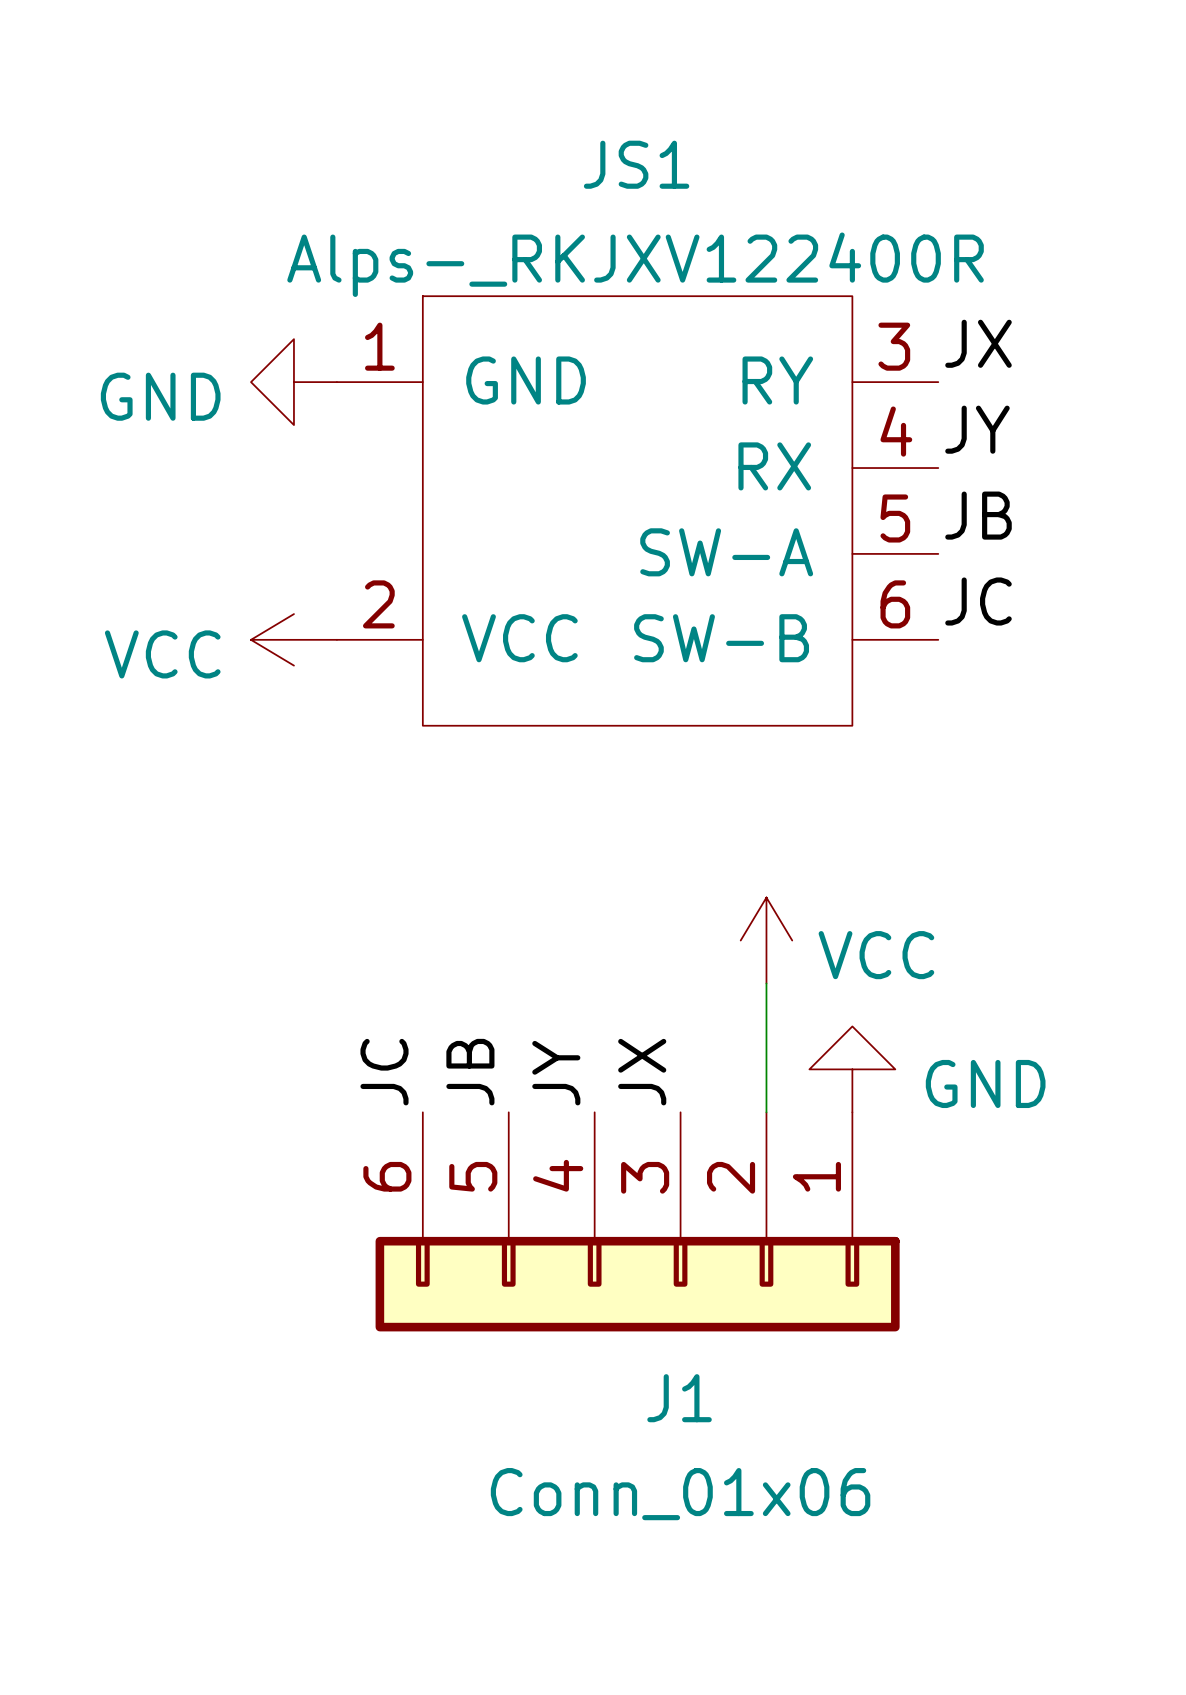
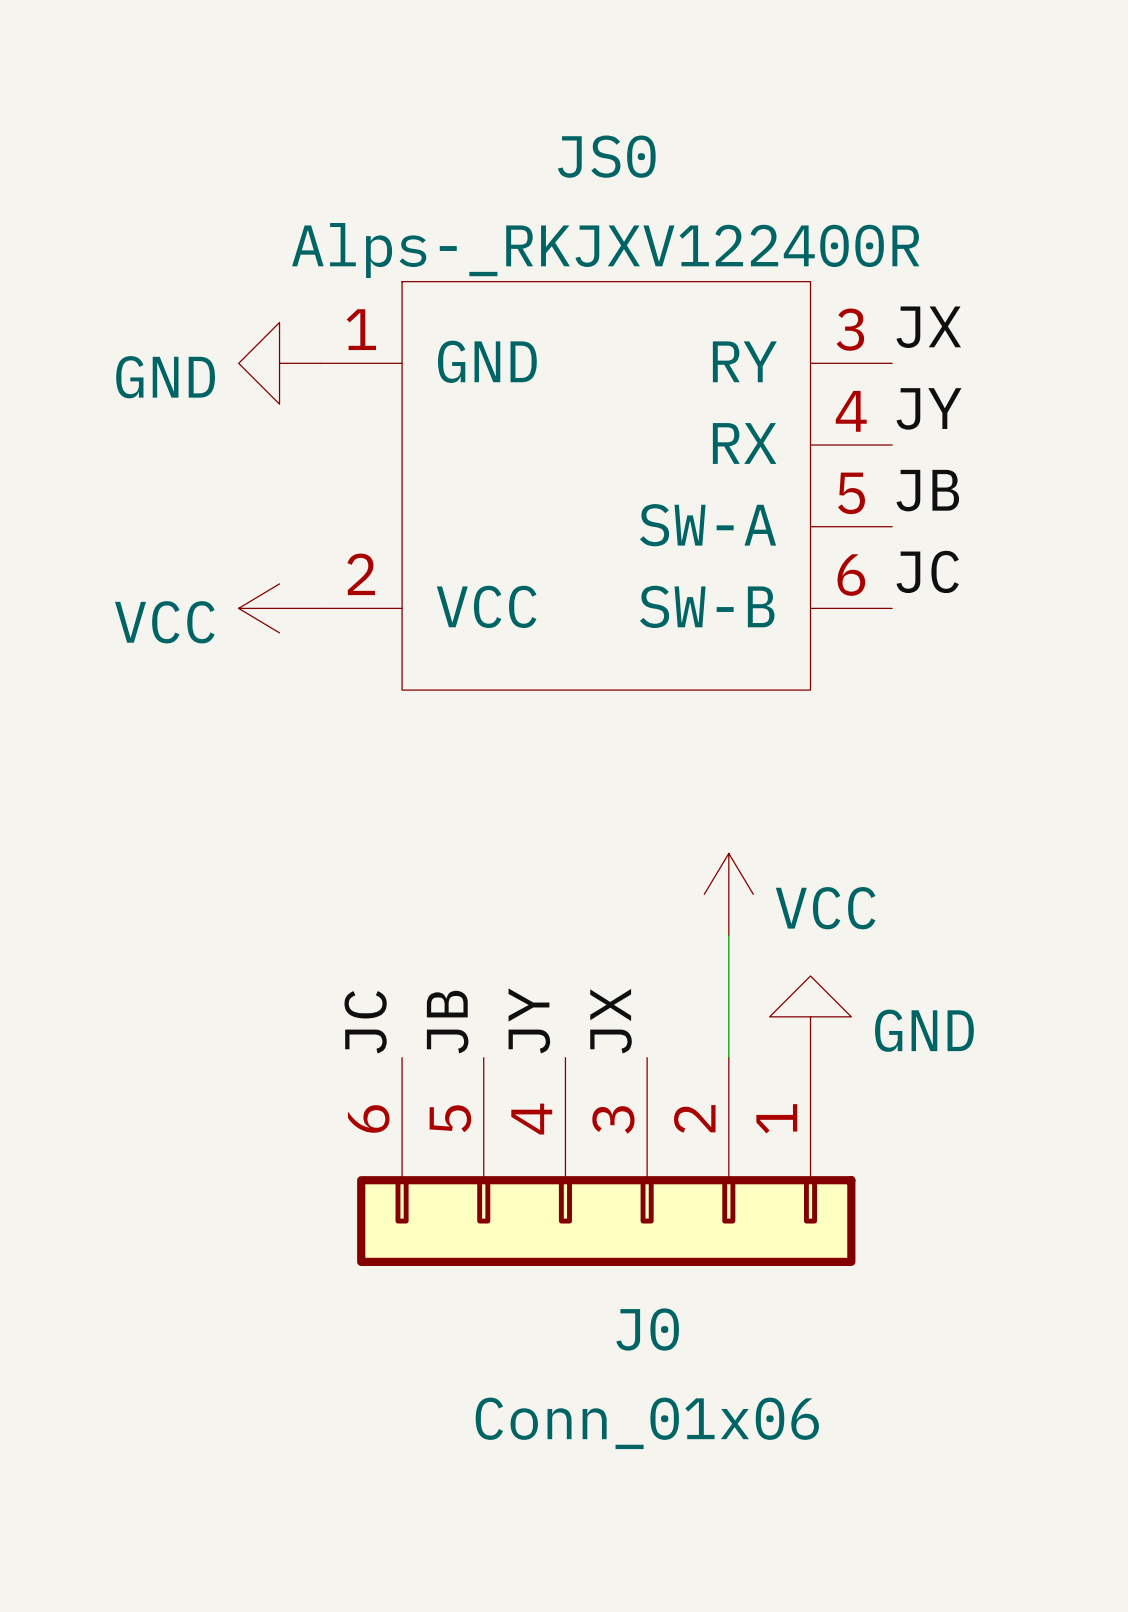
JS1 name: JS1 (636, 164) -> JS0 (606, 156)
J1 name: J1 (679, 1398) -> J0 (647, 1329)

